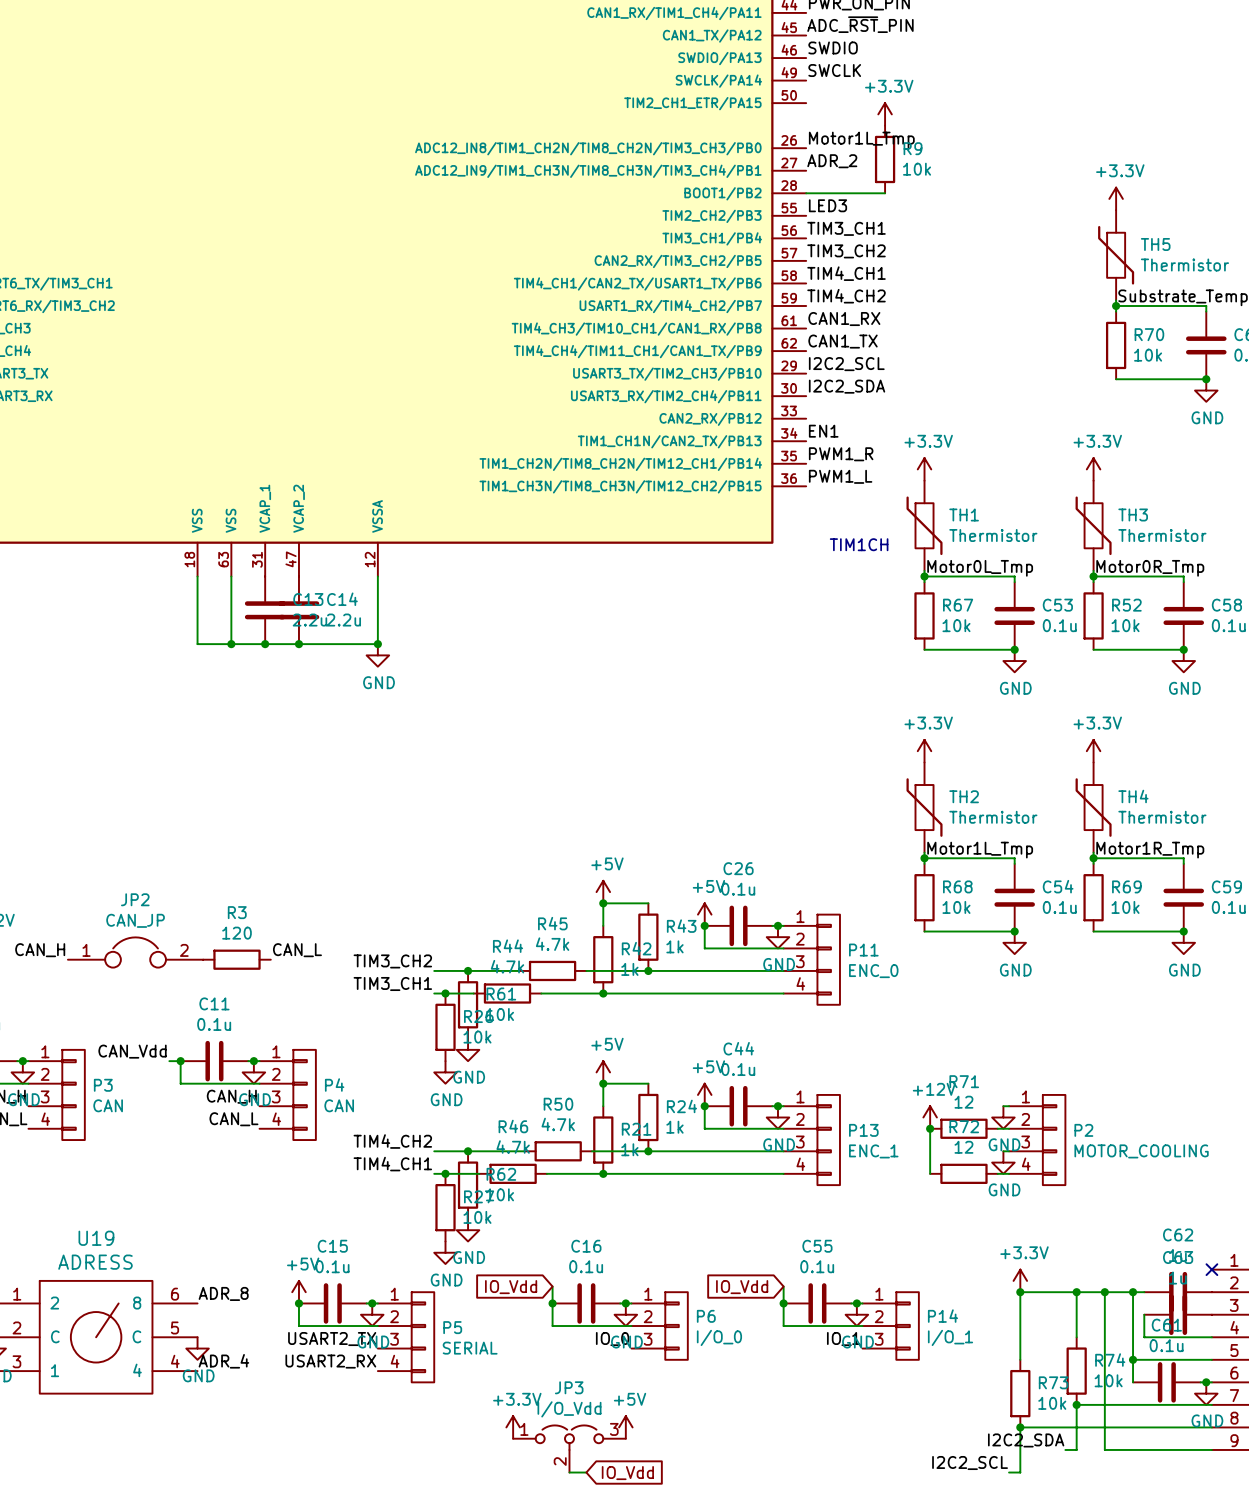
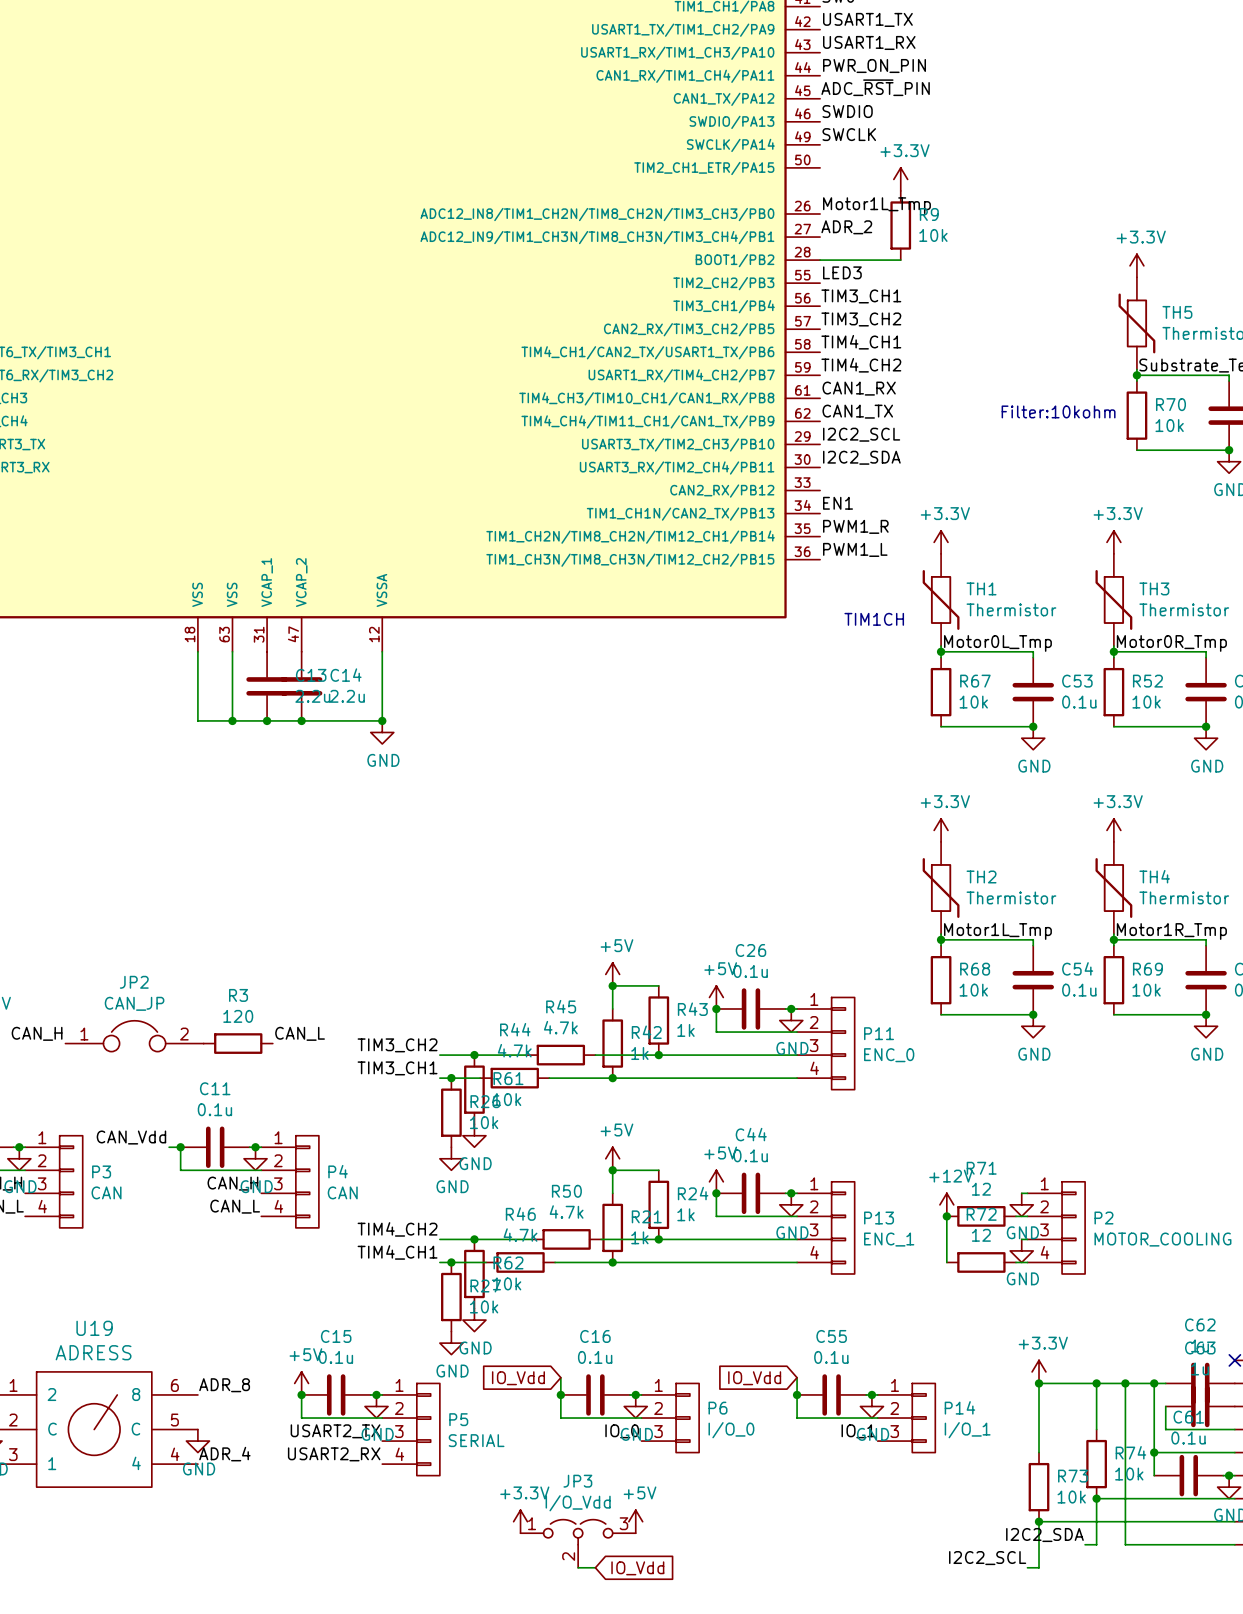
text: none -> Filter:10kohm (1058, 411)

